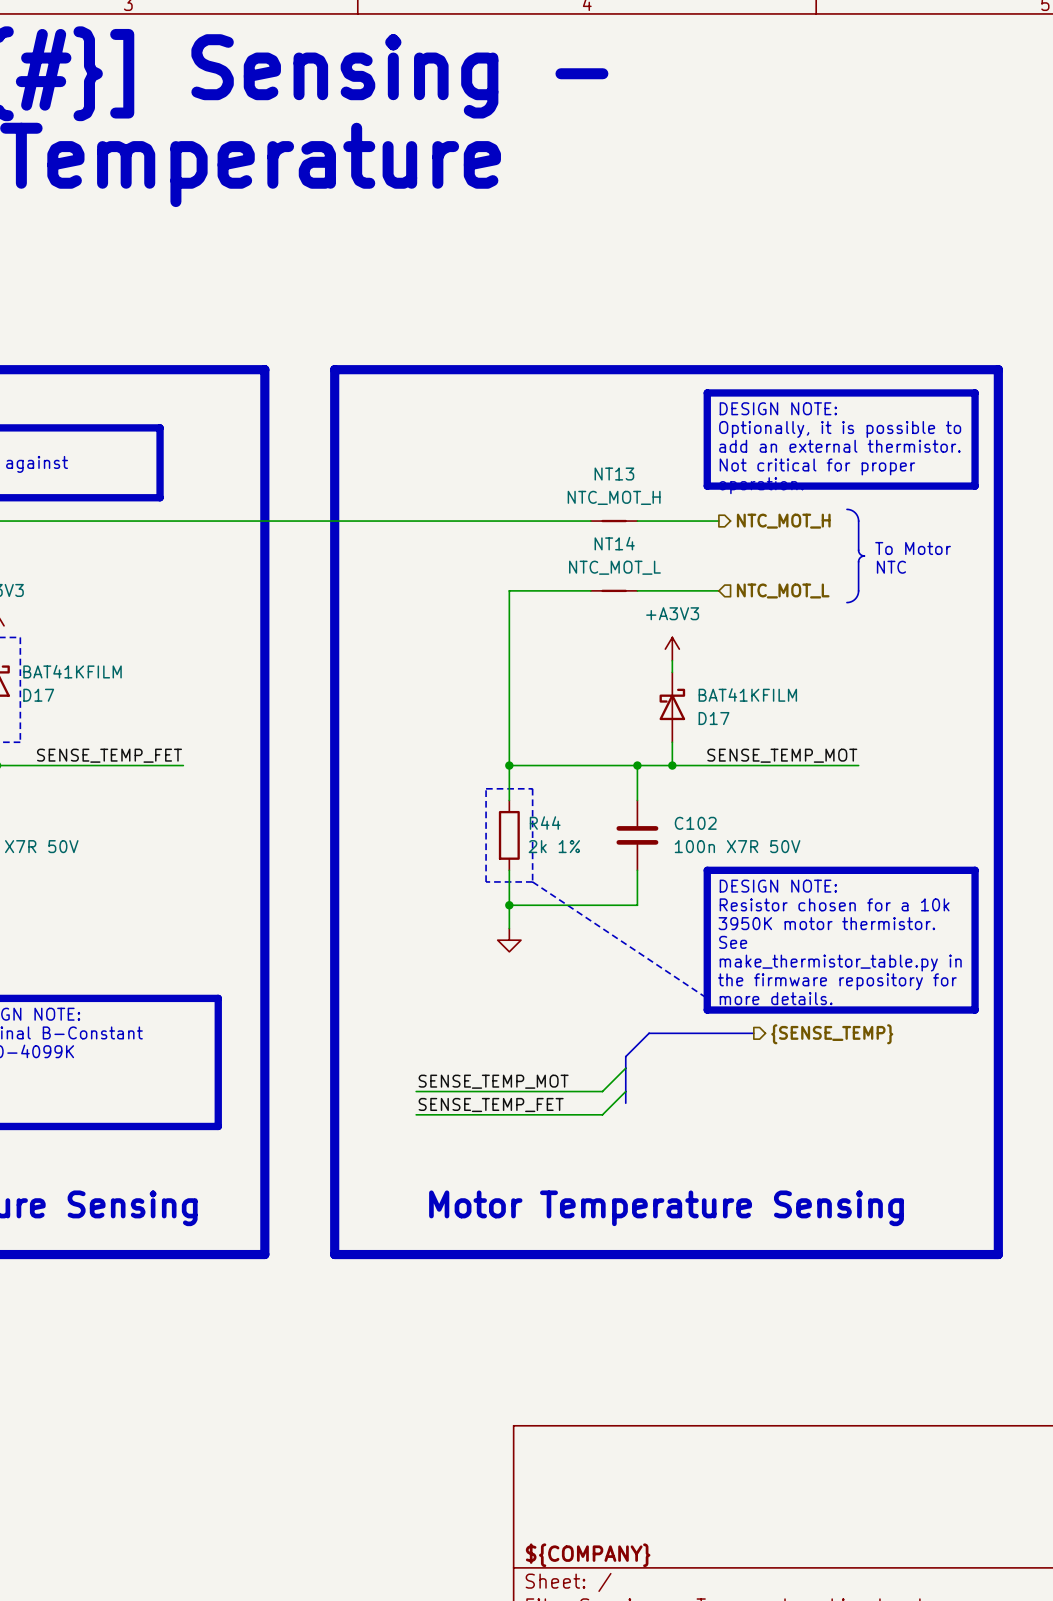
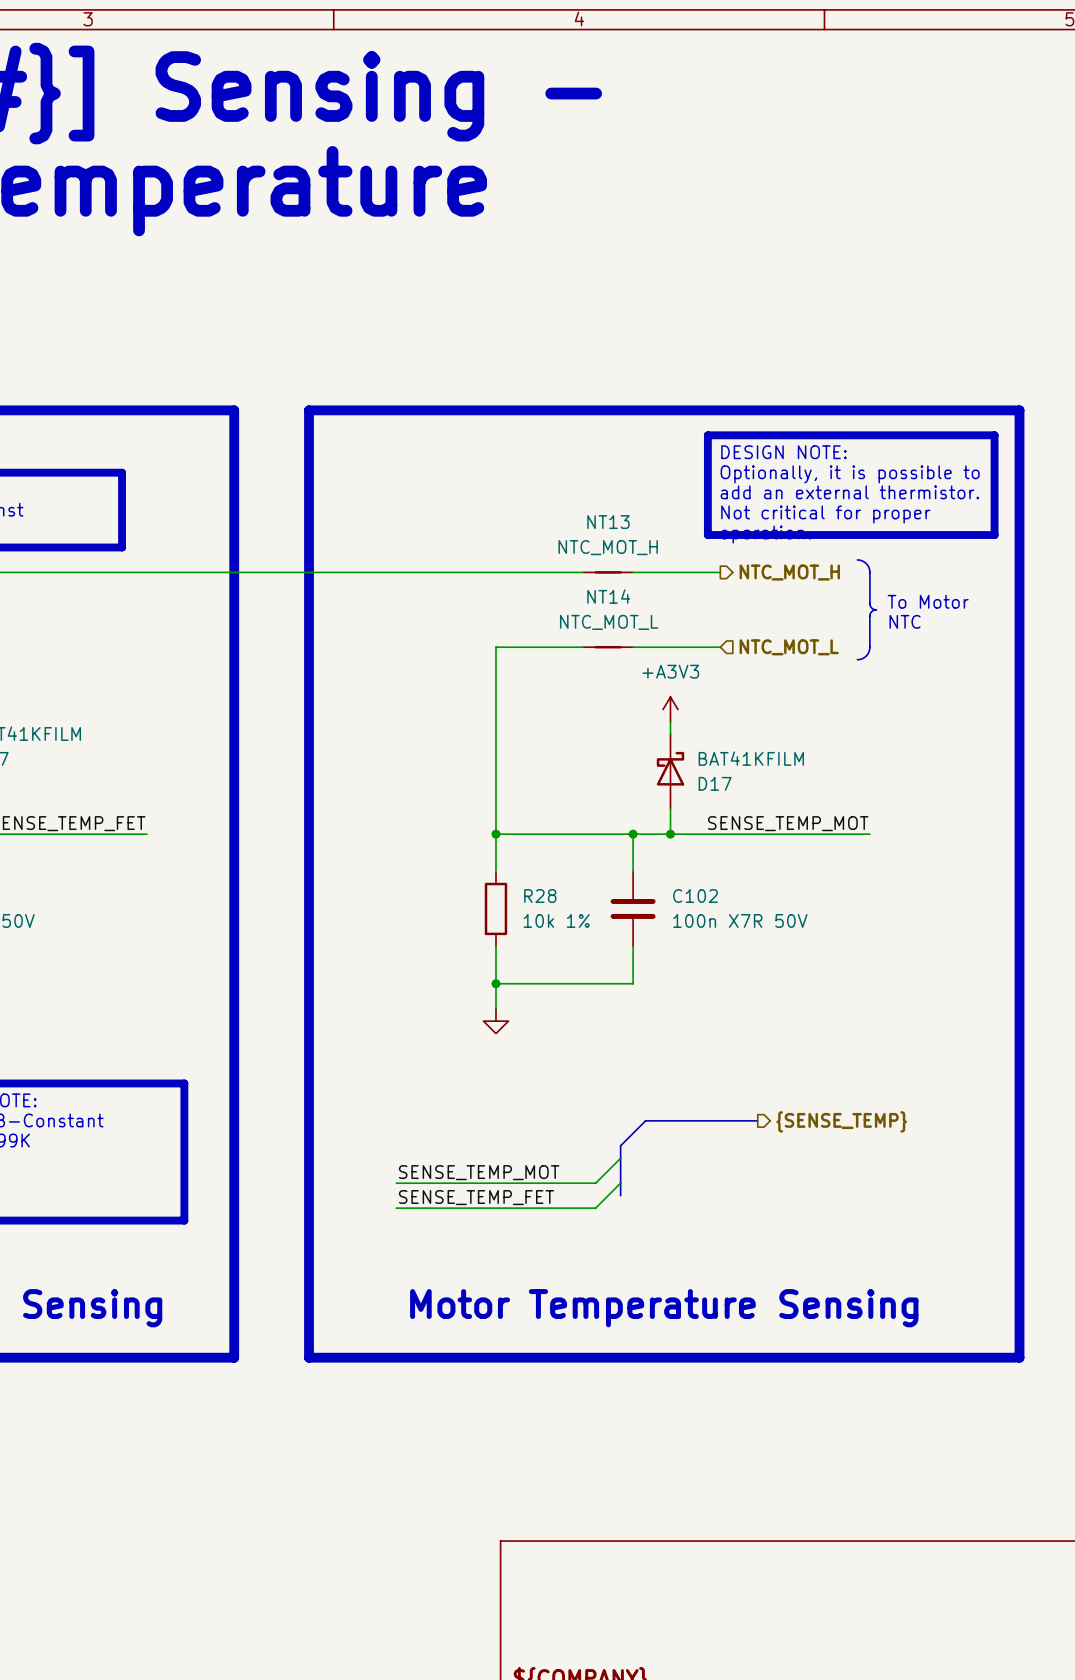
R44 name: R44 (545, 823) -> R28 (540, 896)
R44 value: 2k 1% (554, 846) -> 10k 1% (556, 920)
line: (707, 870) (975, 870) (975, 1010) (707, 1010) (707, 870) -> none
line: (532, 881) (707, 998) -> none
line: (532, 881) (532, 788) (486, 788) (486, 881) (532, 881) -> none
text: DESIGN NOTE: (778, 886) -> none
text: Resistor chosen for a 10k (834, 904) -> none
text: 3950K motor thermistor. (826, 923) -> none
text: See (733, 942) -> none
text: make_thermistor_table.py in (840, 963) -> none
text: the firmware repository for (837, 981) -> none
text: more details. (776, 998) -> none

